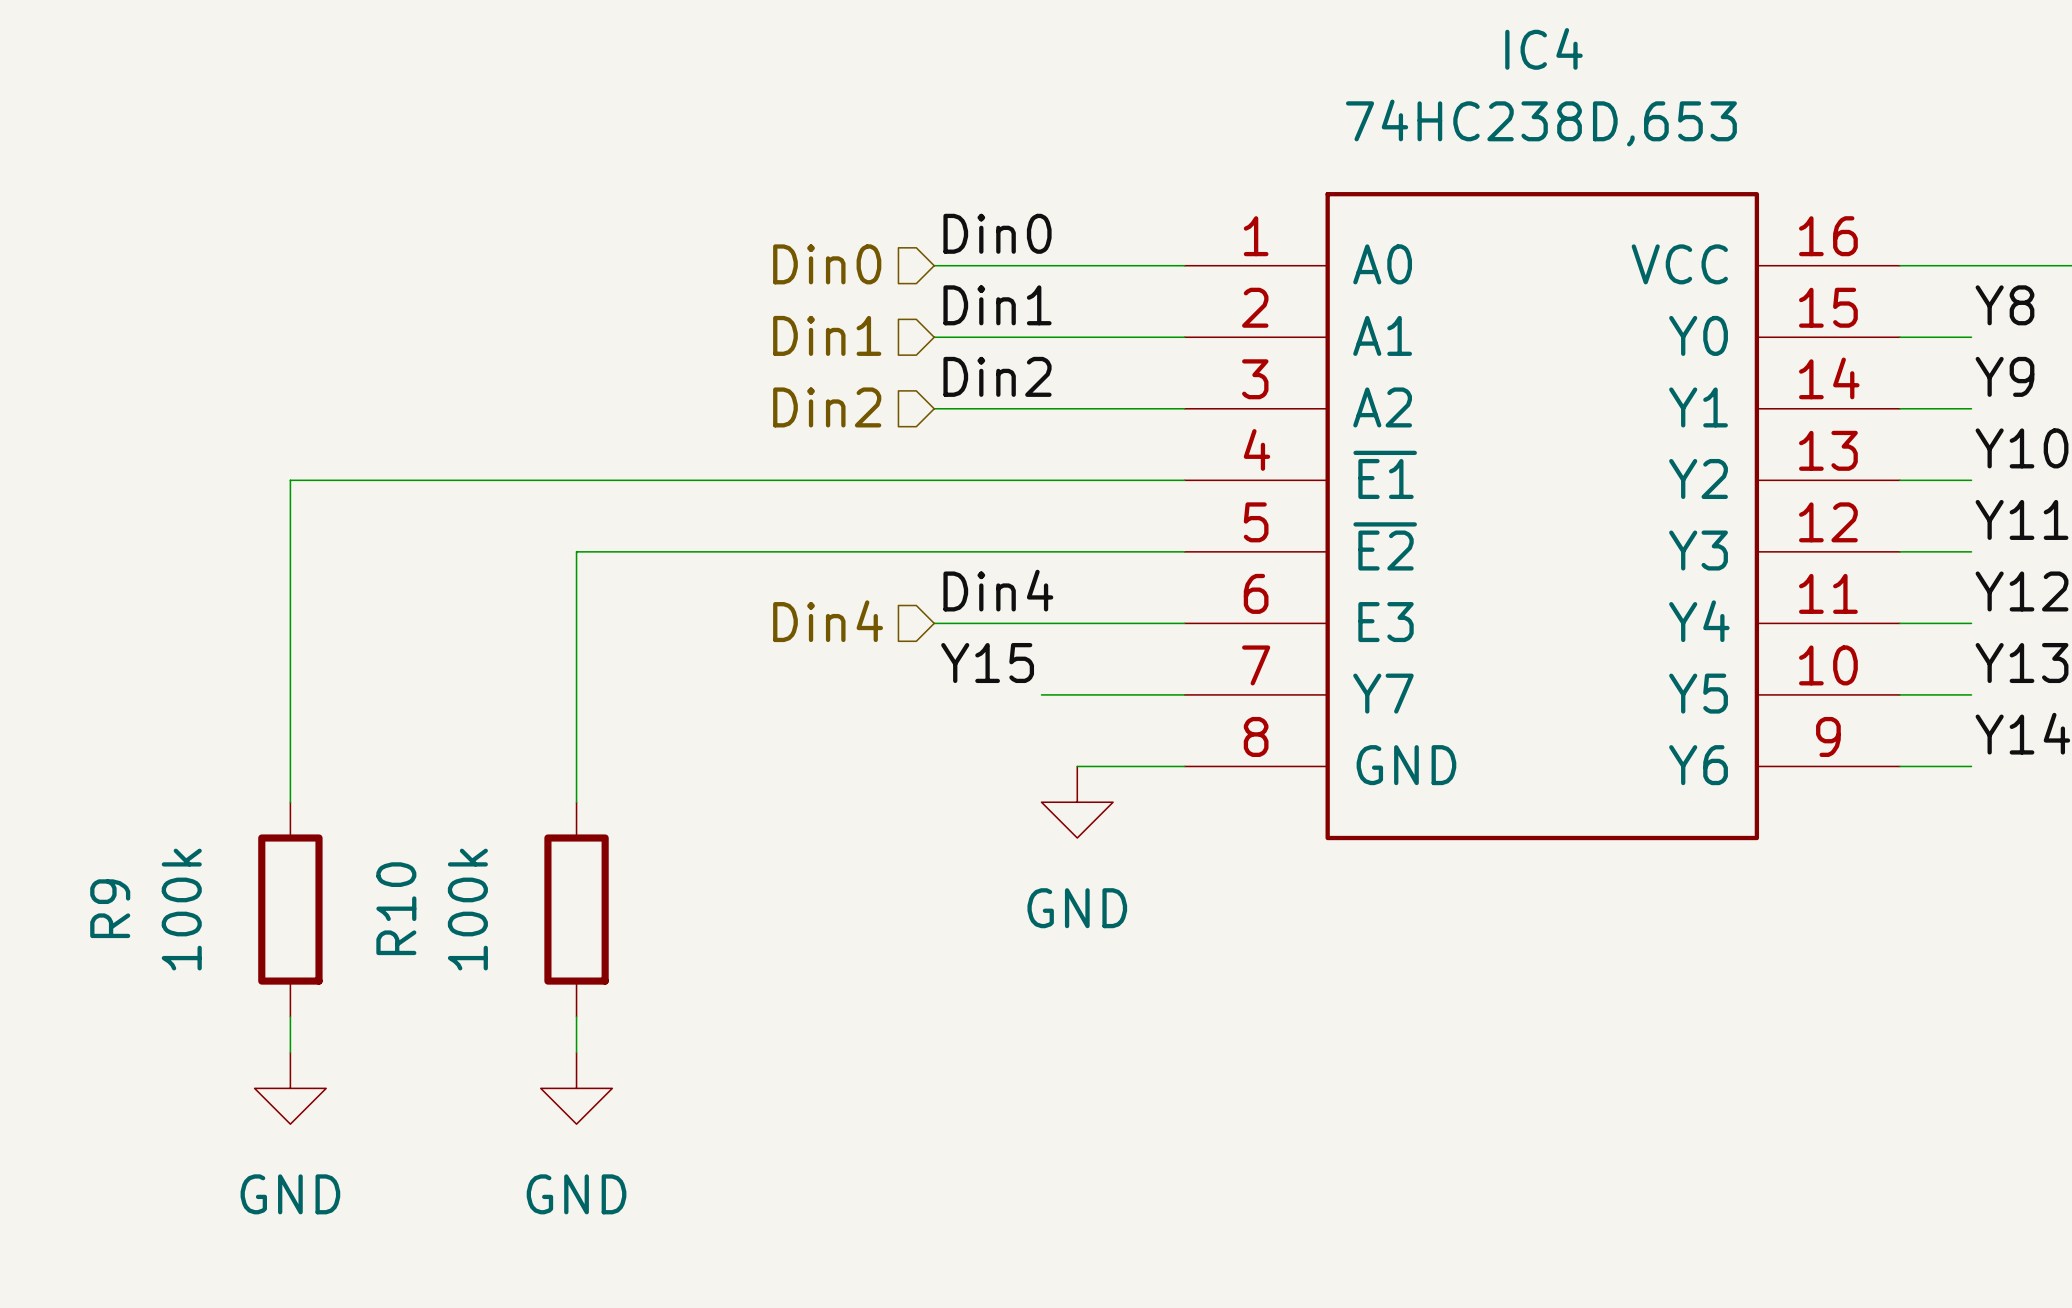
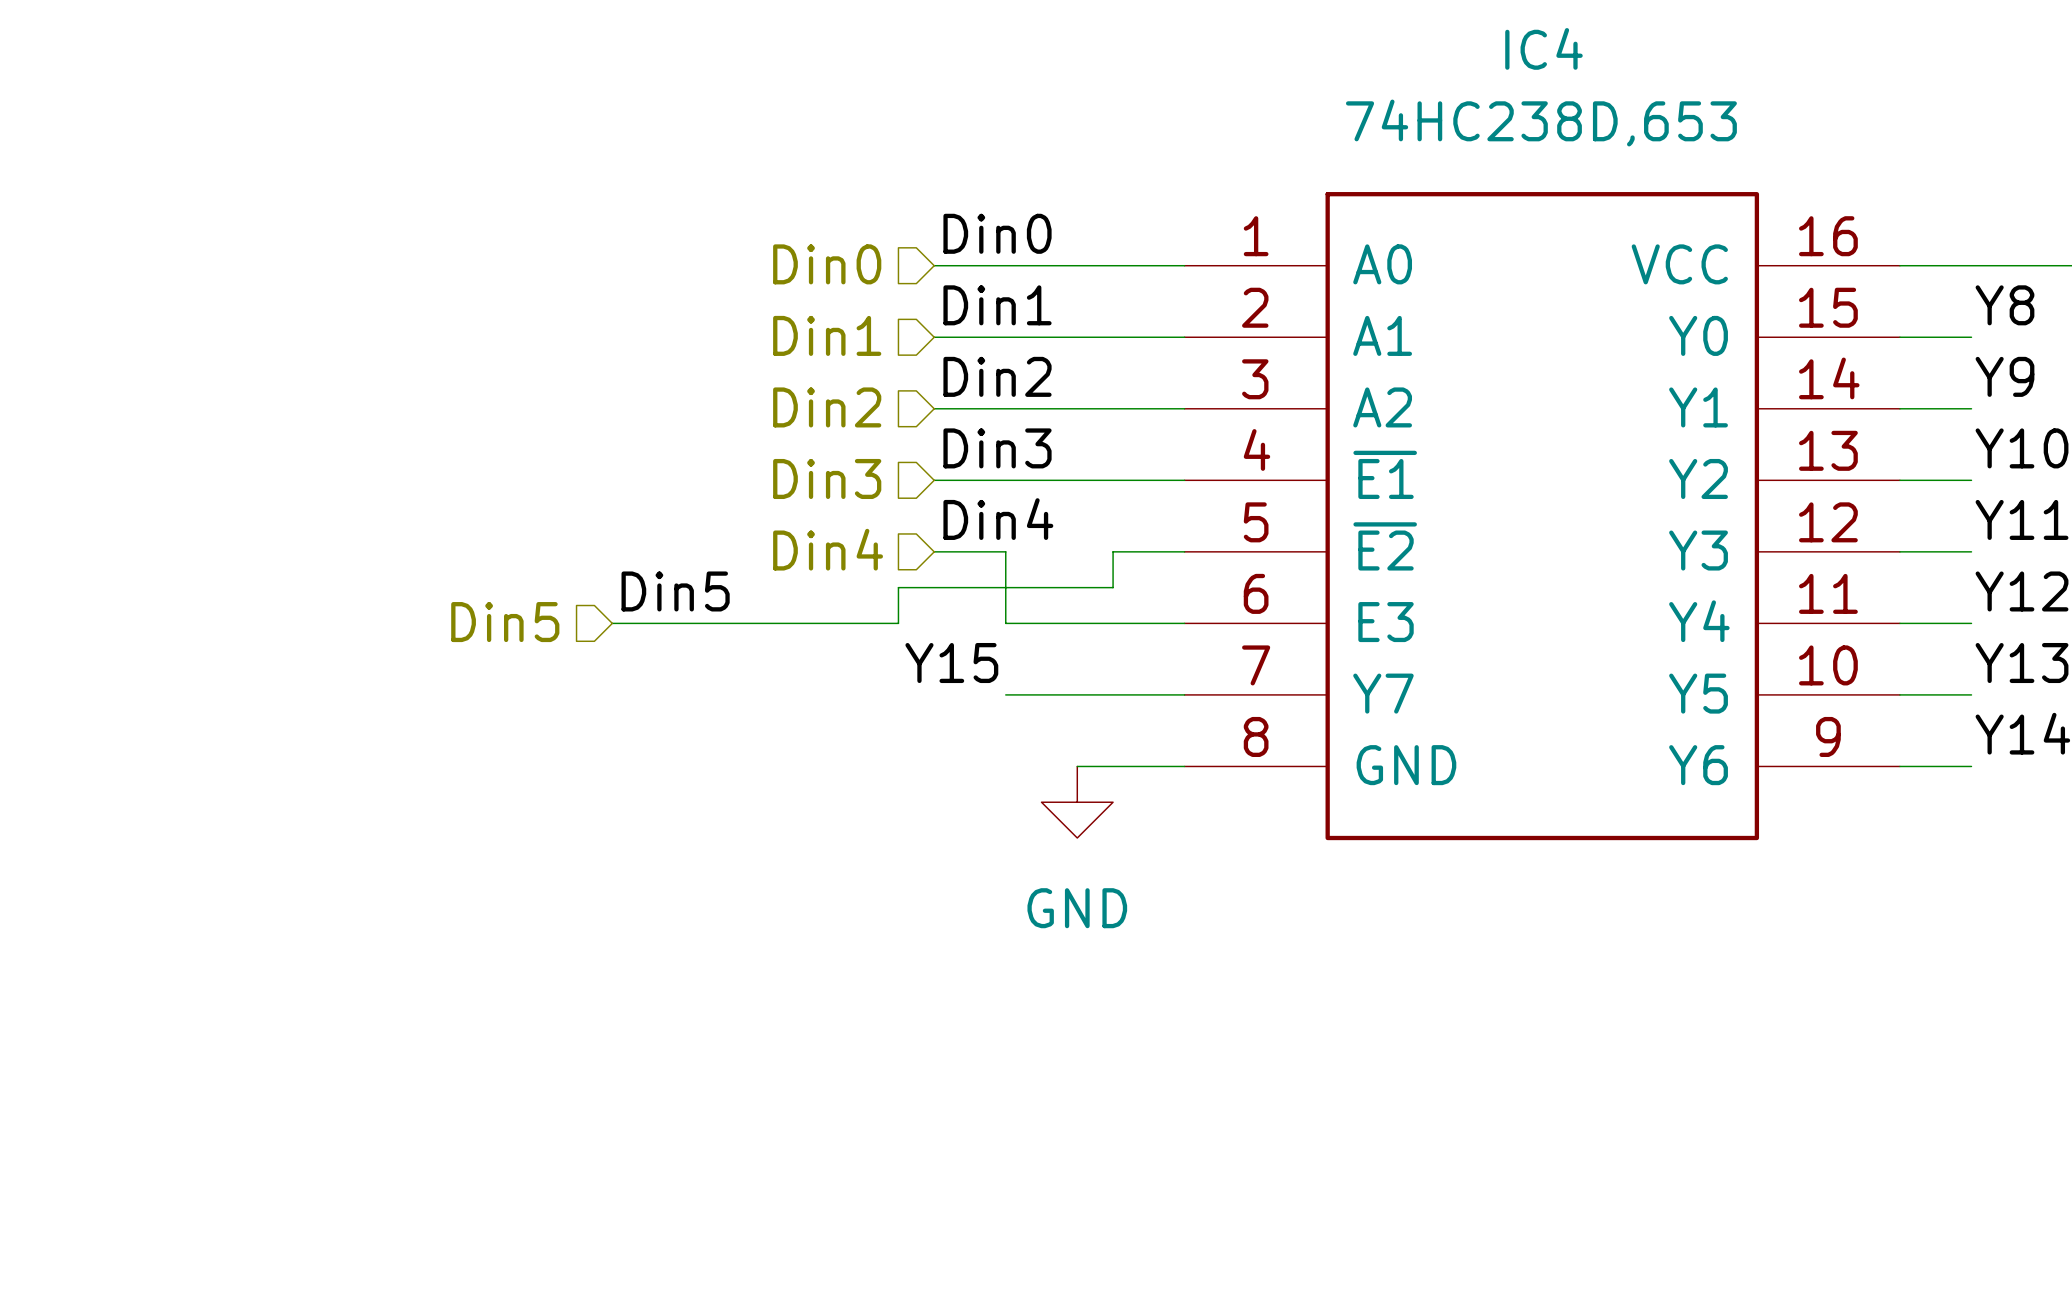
label: none -> Din3 (997, 448)
hierarchical label: none -> Din3 (827, 478)
wire: (934, 480) (290, 480) (290, 802) -> none
wire: (934, 551) (576, 551) (576, 802) -> none
wire: (1005, 551) (1113, 551) -> (612, 623) (898, 623) (898, 587) (1113, 587) (1113, 551)
label position: Din4 (998, 590) -> Din4 (998, 519)
label: none -> Din5 (675, 591)
hierarchical label position: Din4 (828, 621) -> Din4 (828, 549)
hierarchical label: none -> Din5 (505, 622)
wire: (934, 623) (1005, 623) -> (1005, 551) (1005, 623)
label position: Y15 (987, 663) -> Y15 (951, 663)
wire: none -> (1005, 694) (1041, 694)
R9: 100k (290, 909) -> none
R10: 100k (576, 909) -> none
wire: (290, 1016) (290, 1052) -> none
wire: (576, 1016) (576, 1052) -> none
power symbol: GND (290, 1088) -> none
power symbol: GND (576, 1088) -> none

